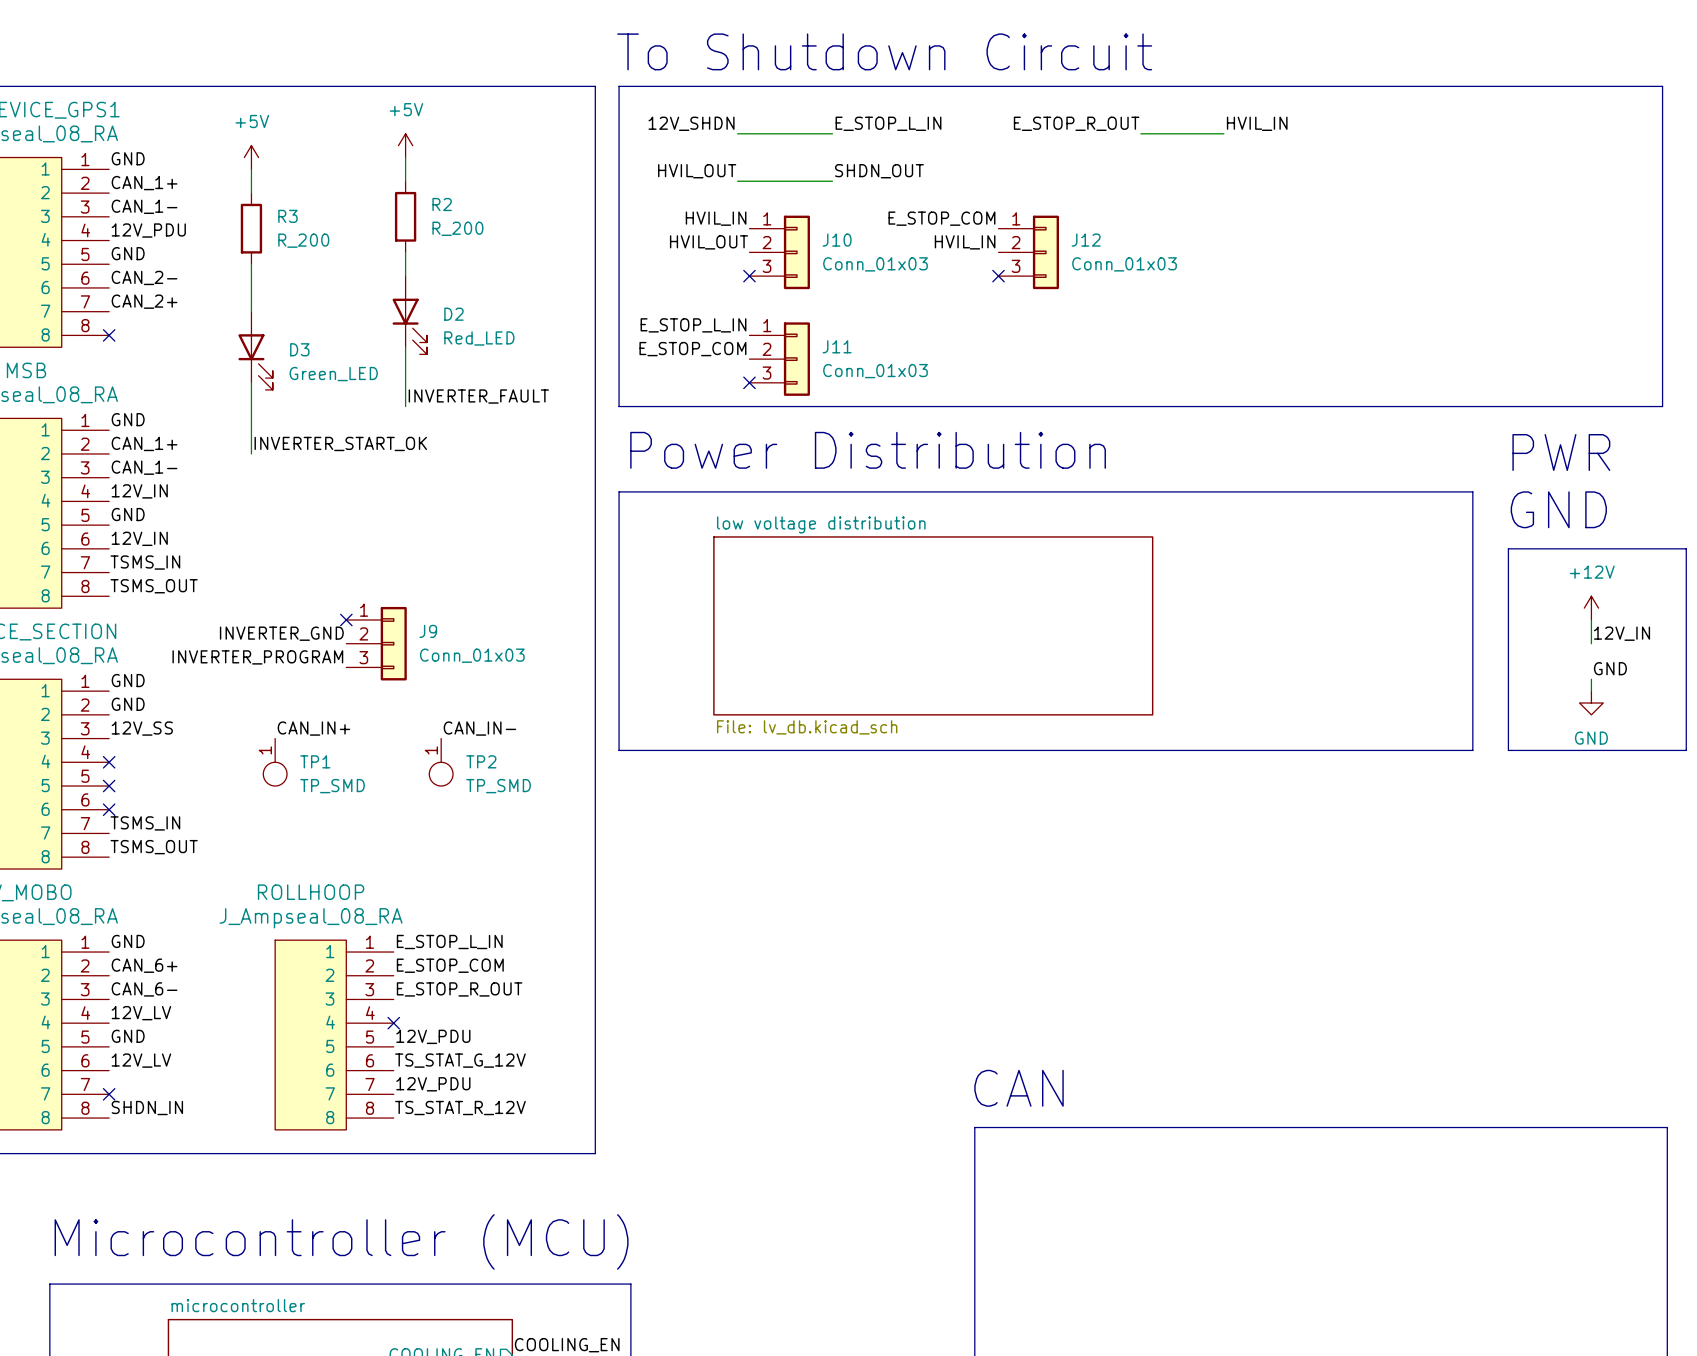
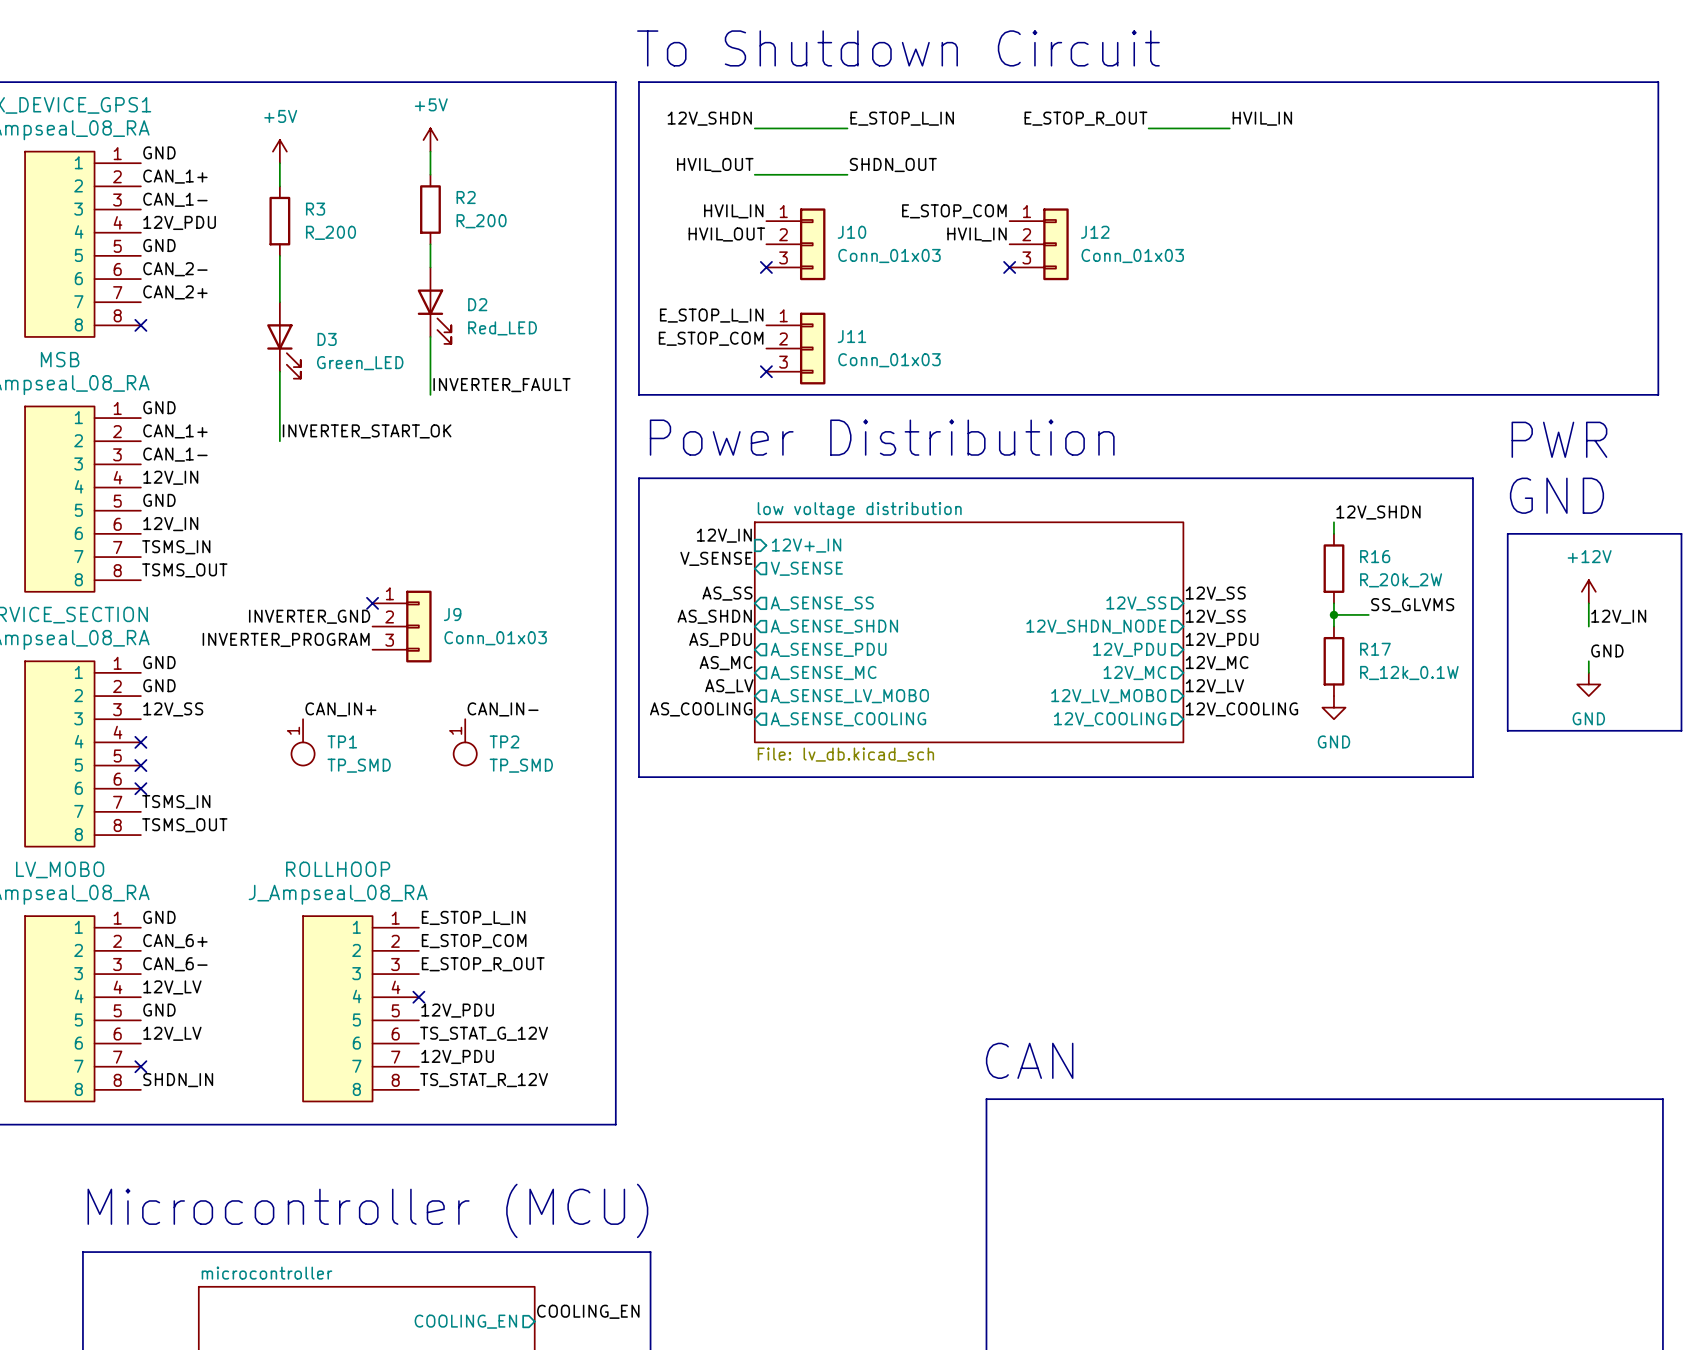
label: none -> 12V_SHDN (1378, 512)
wire: none -> (1333, 522) (1333, 533)
label: none -> 12V_IN (724, 535)
sheet pin: none -> 12V+_IN (806, 545)
label: none -> V_SENSE (716, 558)
sheet pin: none -> V_SENSE (806, 568)
R16: none -> R_20k_2W (1333, 568)
label: none -> AS_SS (727, 593)
label: none -> 12V_SS (1215, 593)
wire: none -> (1333, 603) (1333, 626)
sheet pin: none -> A_SENSE_SS (822, 603)
sheet pin: none -> 12V_SS (1136, 603)
label: none -> SS_GLVMS (1412, 605)
sheet low voltage distribution: File: lv_db.kicad_sch (933, 625) -> none
wire: none -> (1333, 614) (1368, 614)
junction: none -> (1333, 614)
label: none -> AS_SHDN (714, 616)
label: none -> 12V_SS (1215, 616)
sheet pin: none -> A_SENSE_SHDN (834, 626)
sheet pin: none -> 12V_SHDN_NODE (1096, 626)
sheet low voltage distribution: none -> File: lv_db.kicad_sch (969, 632)
label: none -> AS_PDU (720, 639)
label: none -> 12V_PDU (1222, 639)
sheet pin: none -> A_SENSE_PDU (828, 649)
sheet pin: none -> 12V_PDU (1129, 649)
R17: none -> R_12k_0.1W (1333, 661)
label: none -> AS_MC (726, 663)
label: none -> 12V_MC (1217, 663)
sheet pin: none -> A_SENSE_MC (823, 673)
sheet pin: none -> 12V_MC (1134, 673)
label: none -> AS_LV (729, 686)
label: none -> 12V_LV (1214, 686)
sheet pin: none -> A_SENSE_LV_MOBO (849, 696)
sheet pin: none -> 12V_LV_MOBO (1108, 696)
power symbol: none -> GND (1333, 707)
label: none -> AS_COOLING (701, 709)
label: none -> 12V_COOLING (1241, 709)
sheet pin: none -> A_SENSE_COOLING (848, 719)
sheet pin: none -> 12V_COOLING (1110, 719)
line: (619, 750) (1472, 750) -> (638, 730) (638, 777) (1472, 777) (1472, 730)

